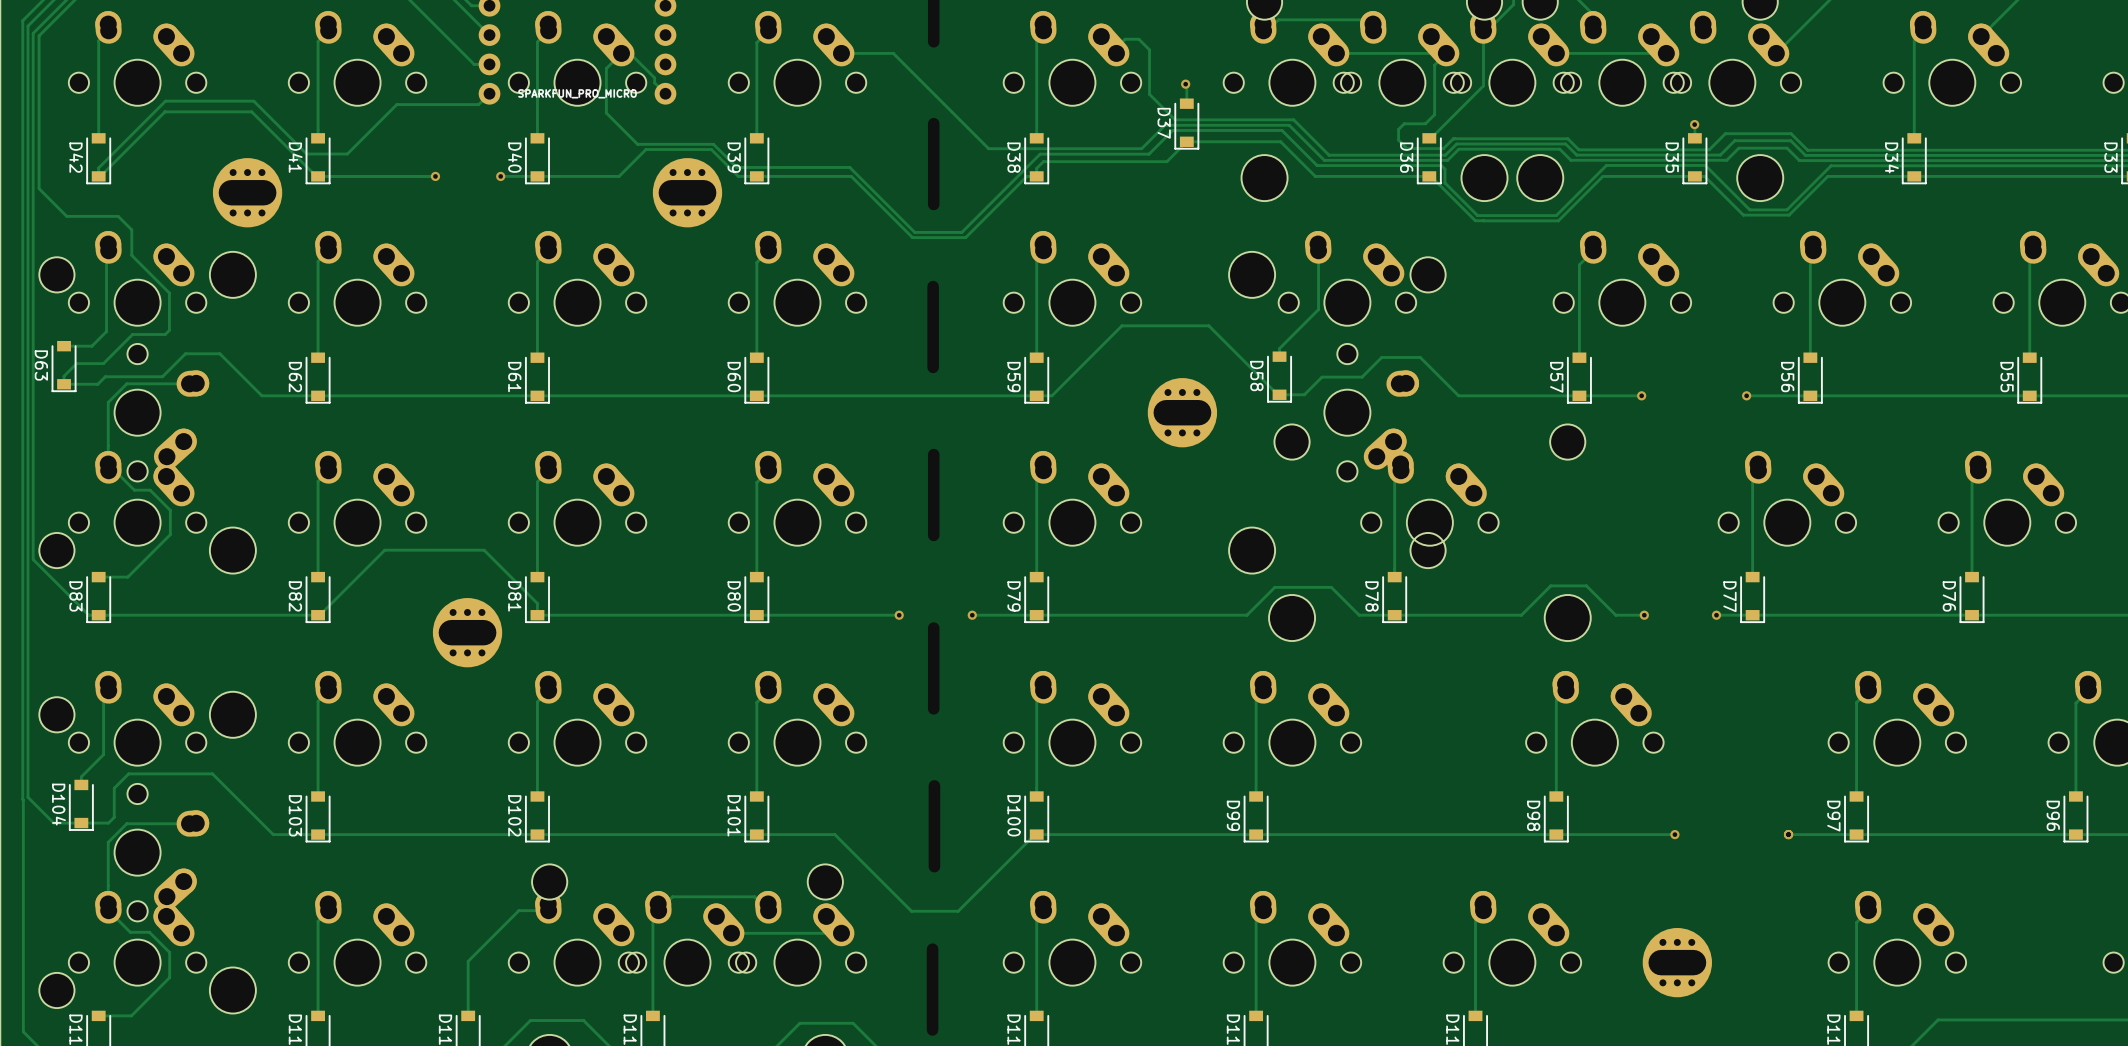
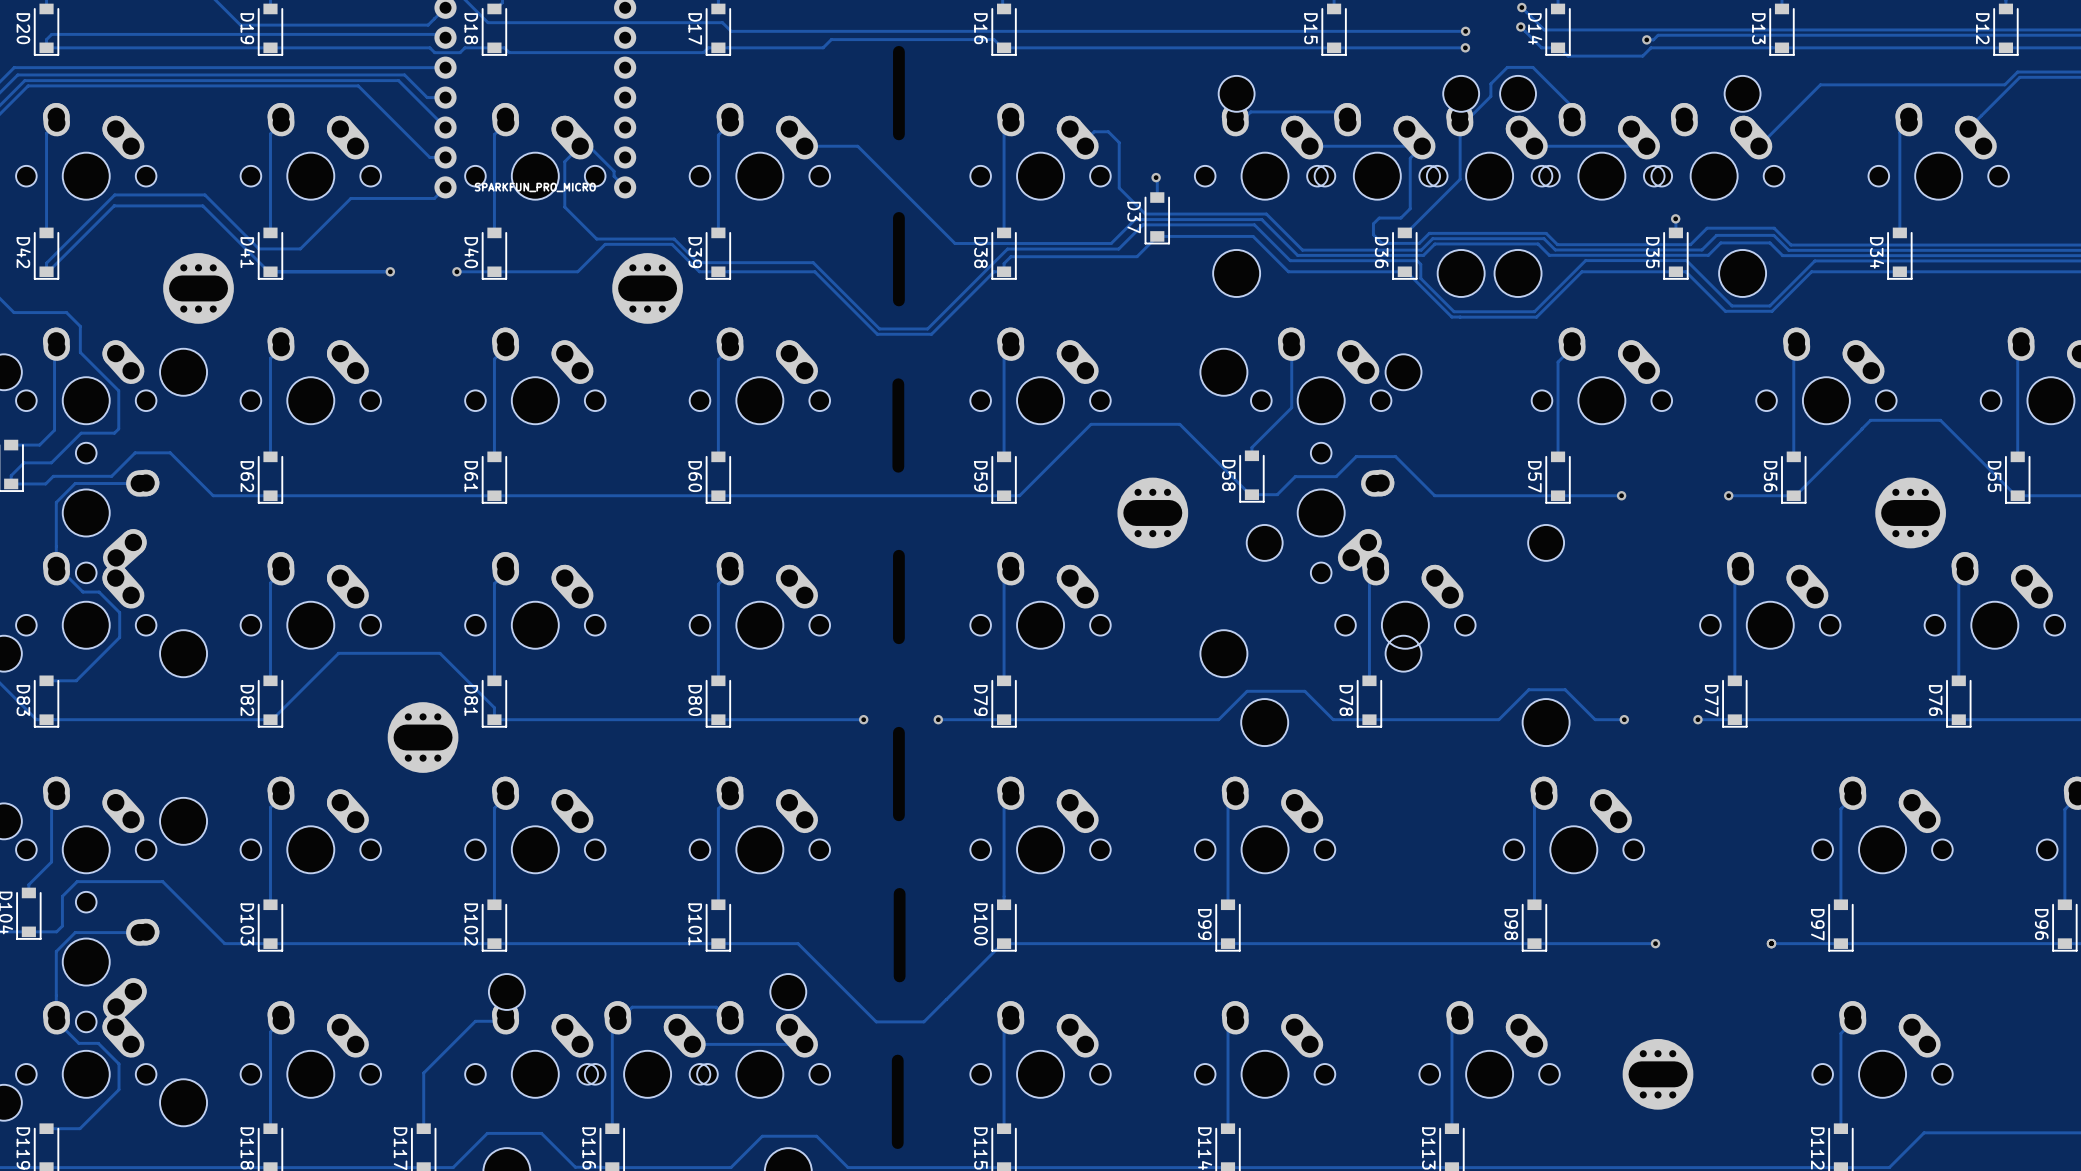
track: (2028, 395) (1812, 395) -> (2015, 495) (1940, 420) (1870, 420) (1795, 495)
part: none -> (1910, 512)

